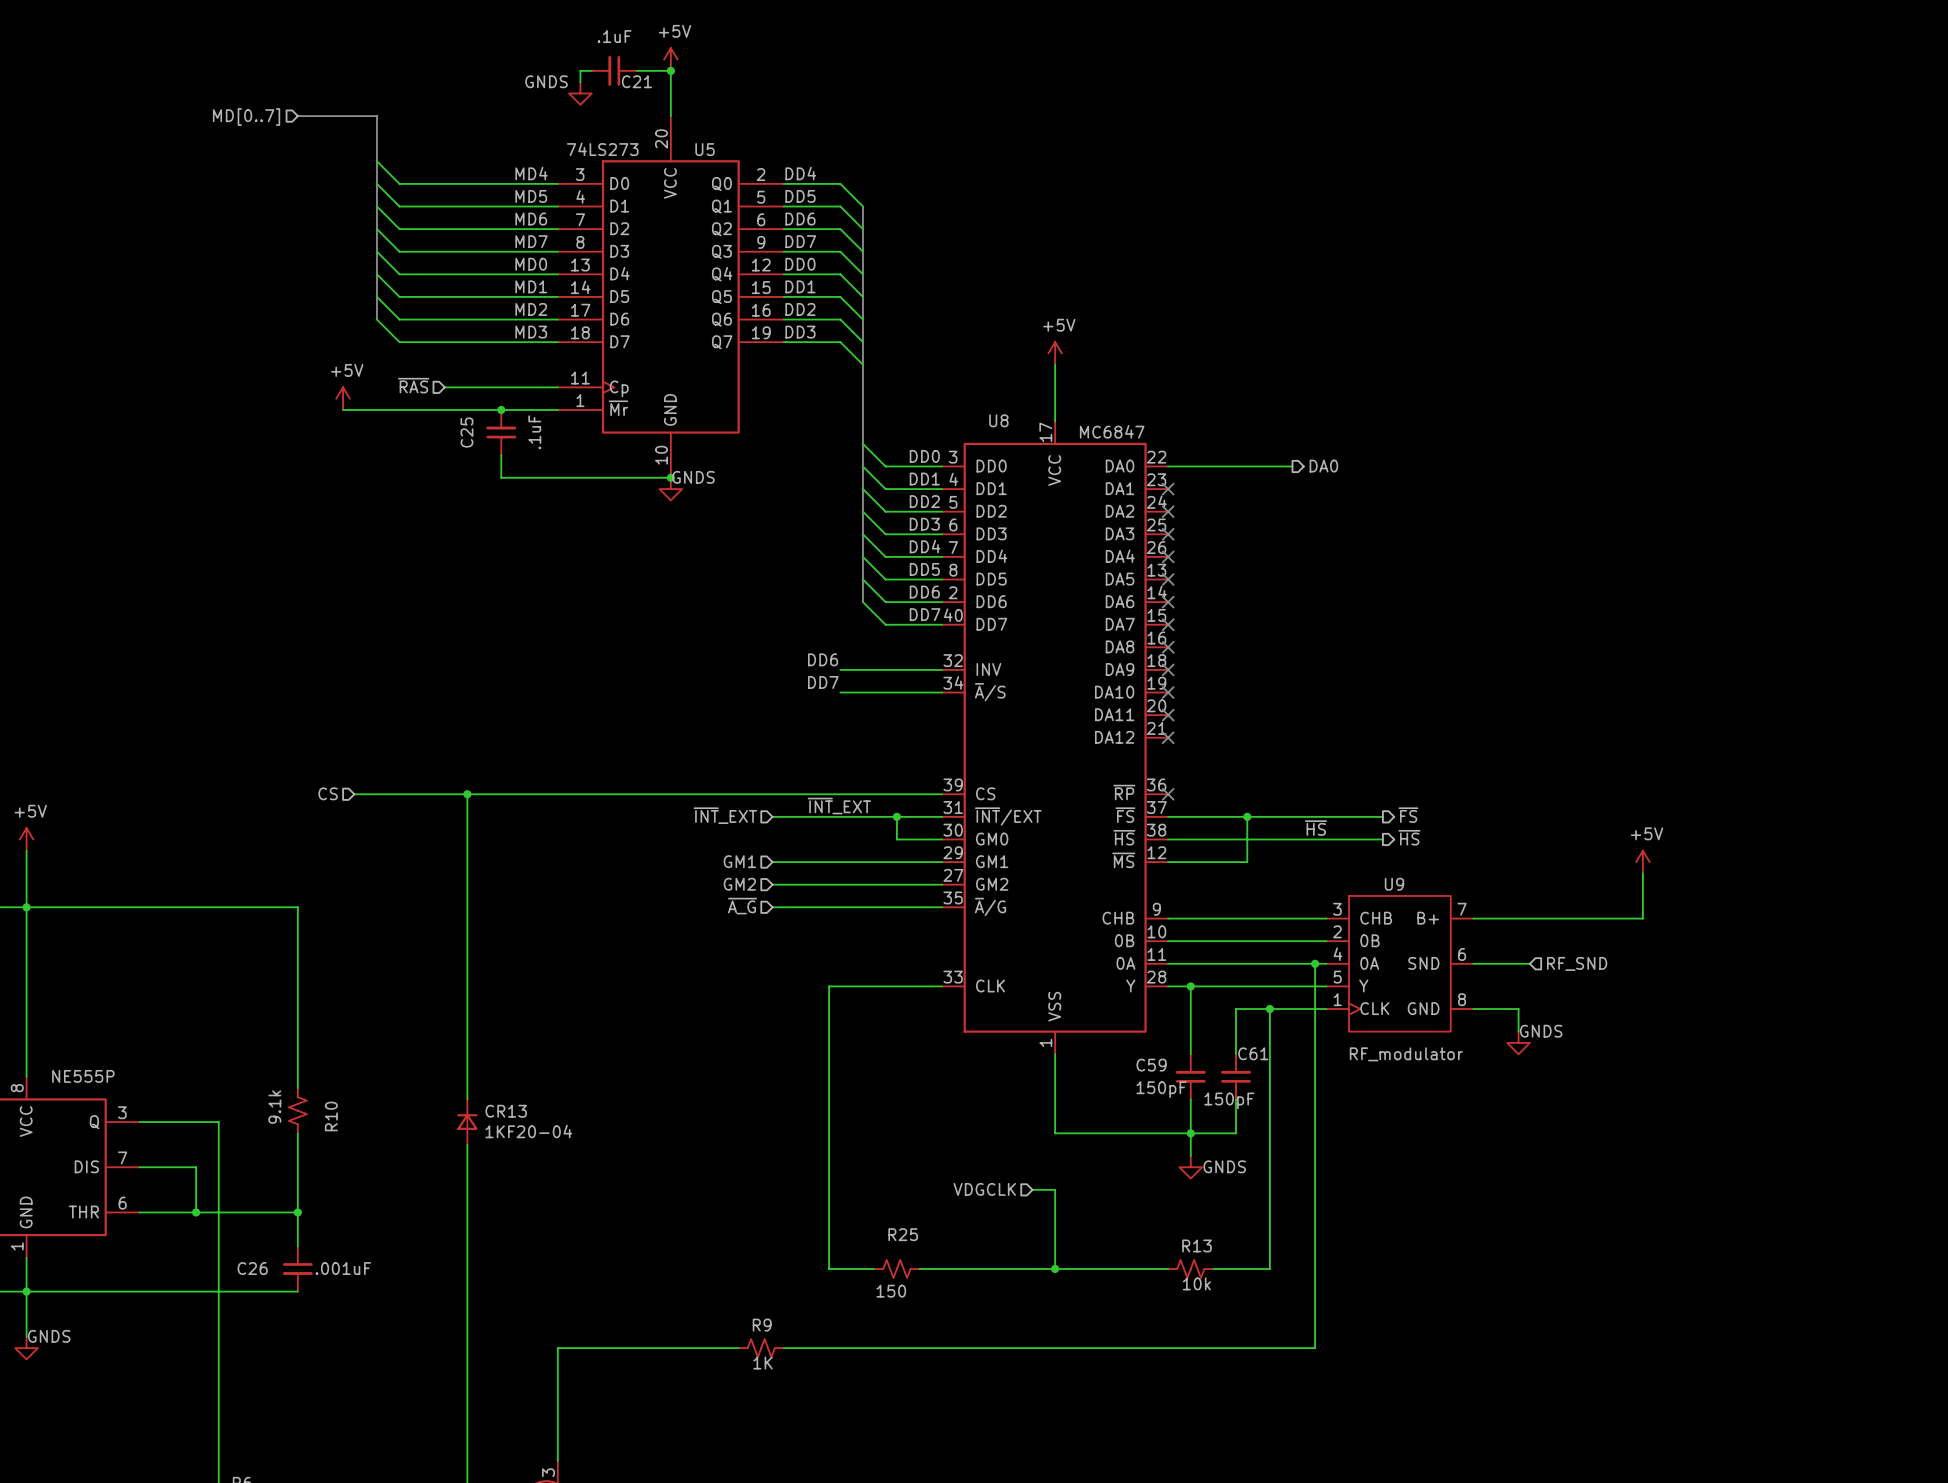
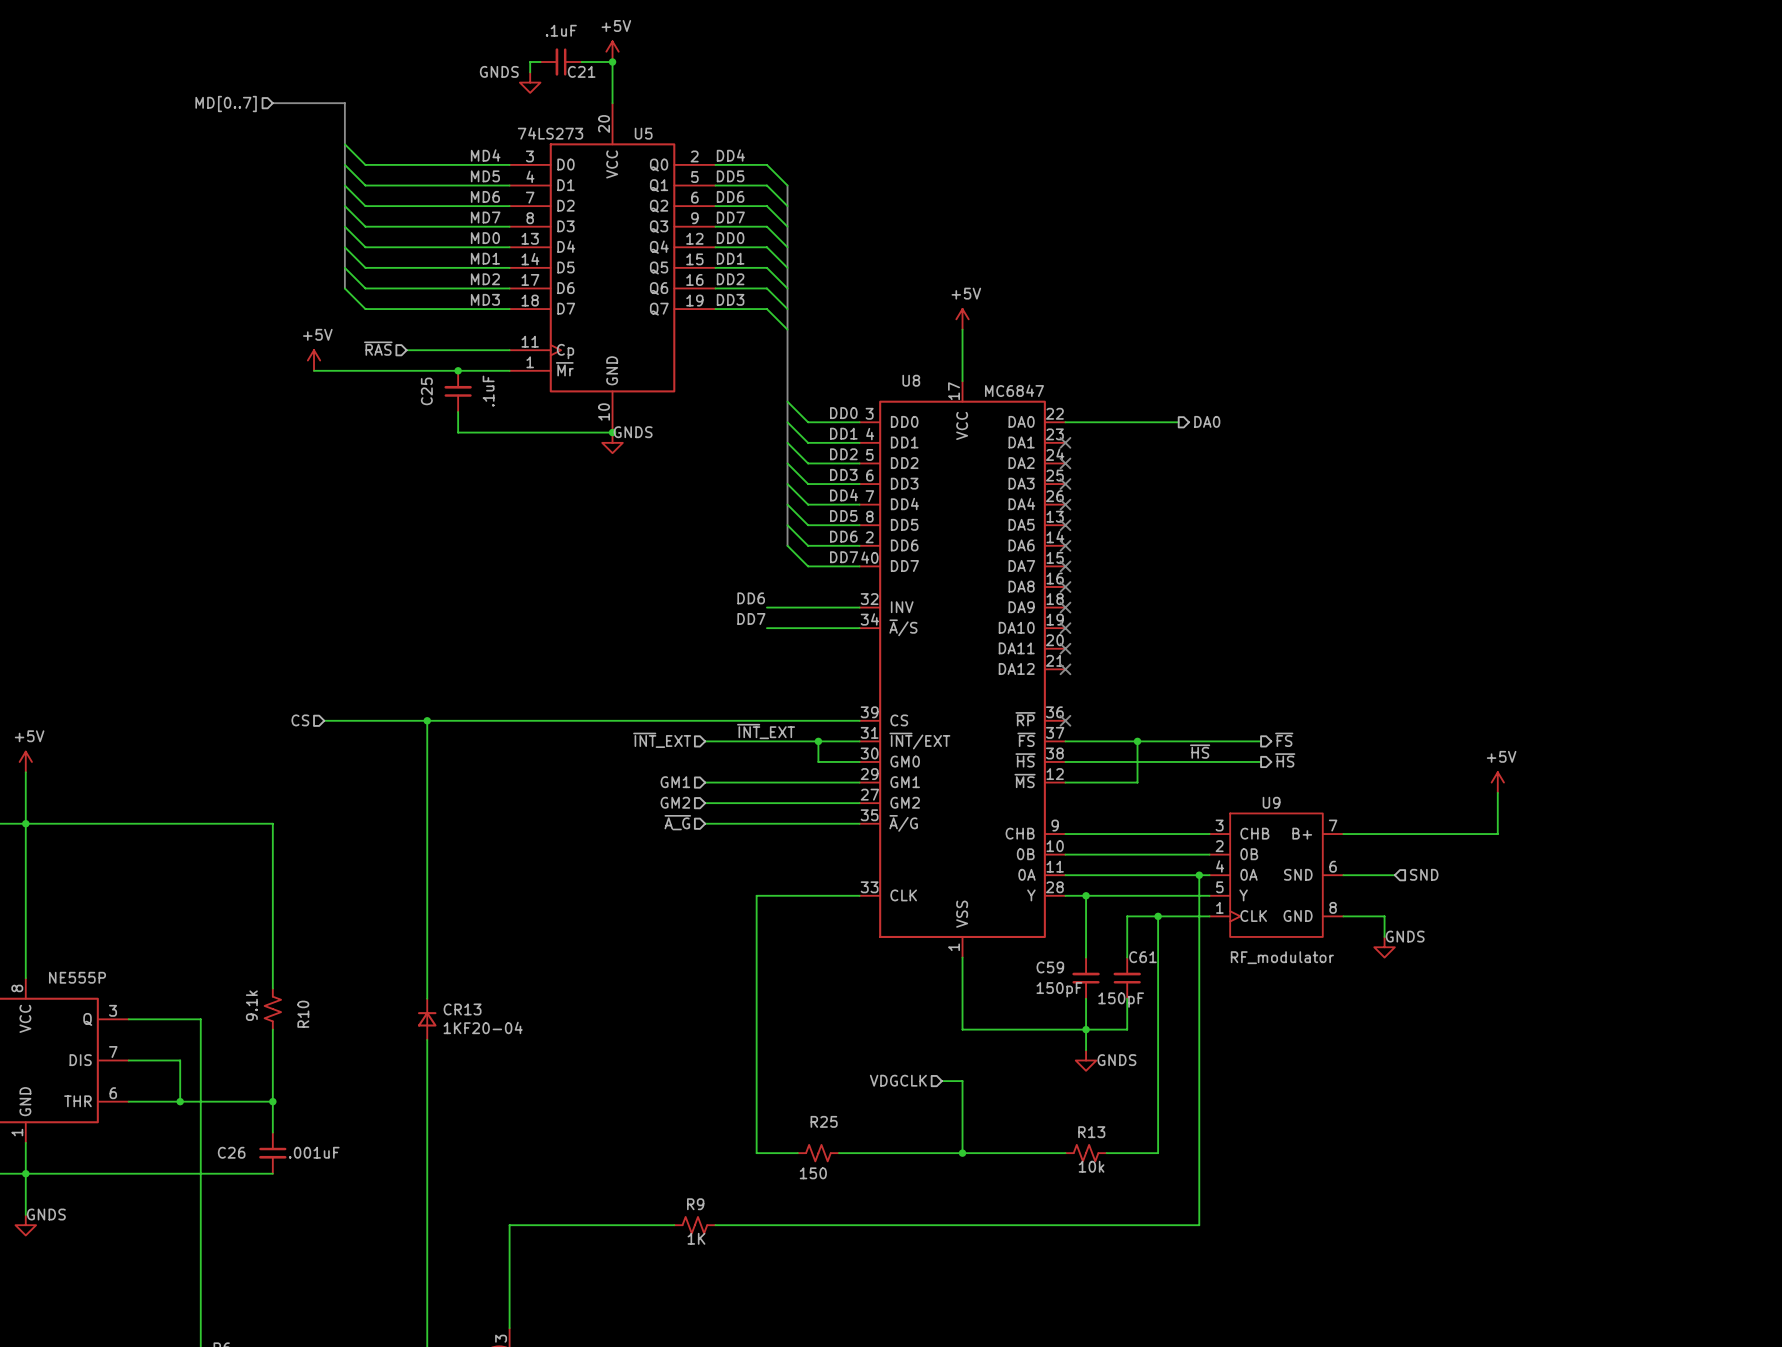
hierarchical label: RF_SND (1577, 963) -> SND (1424, 874)

